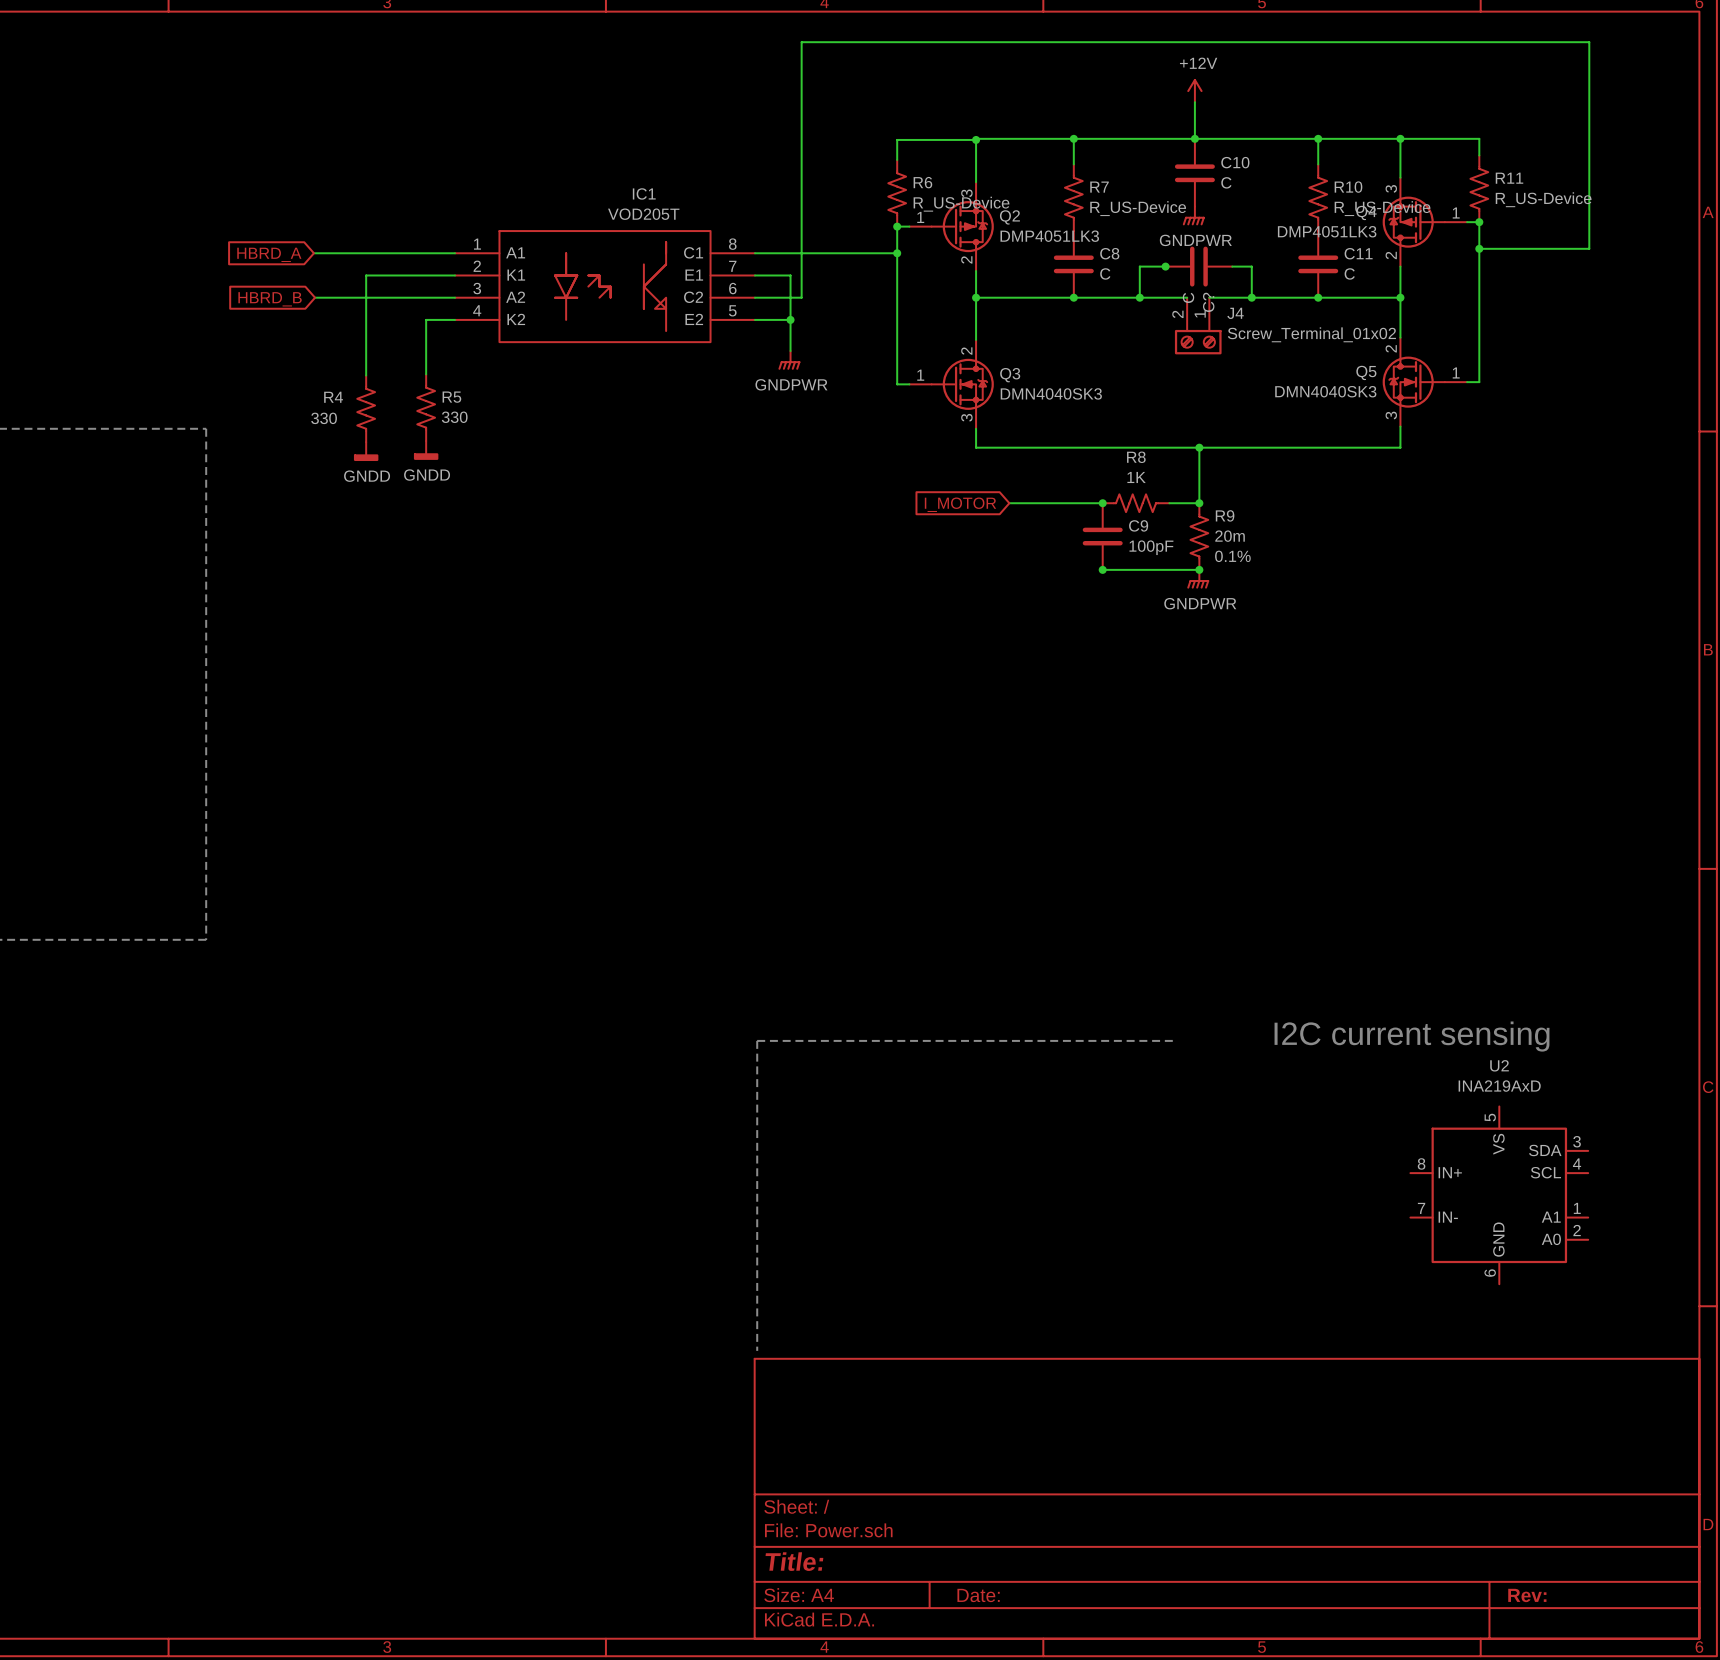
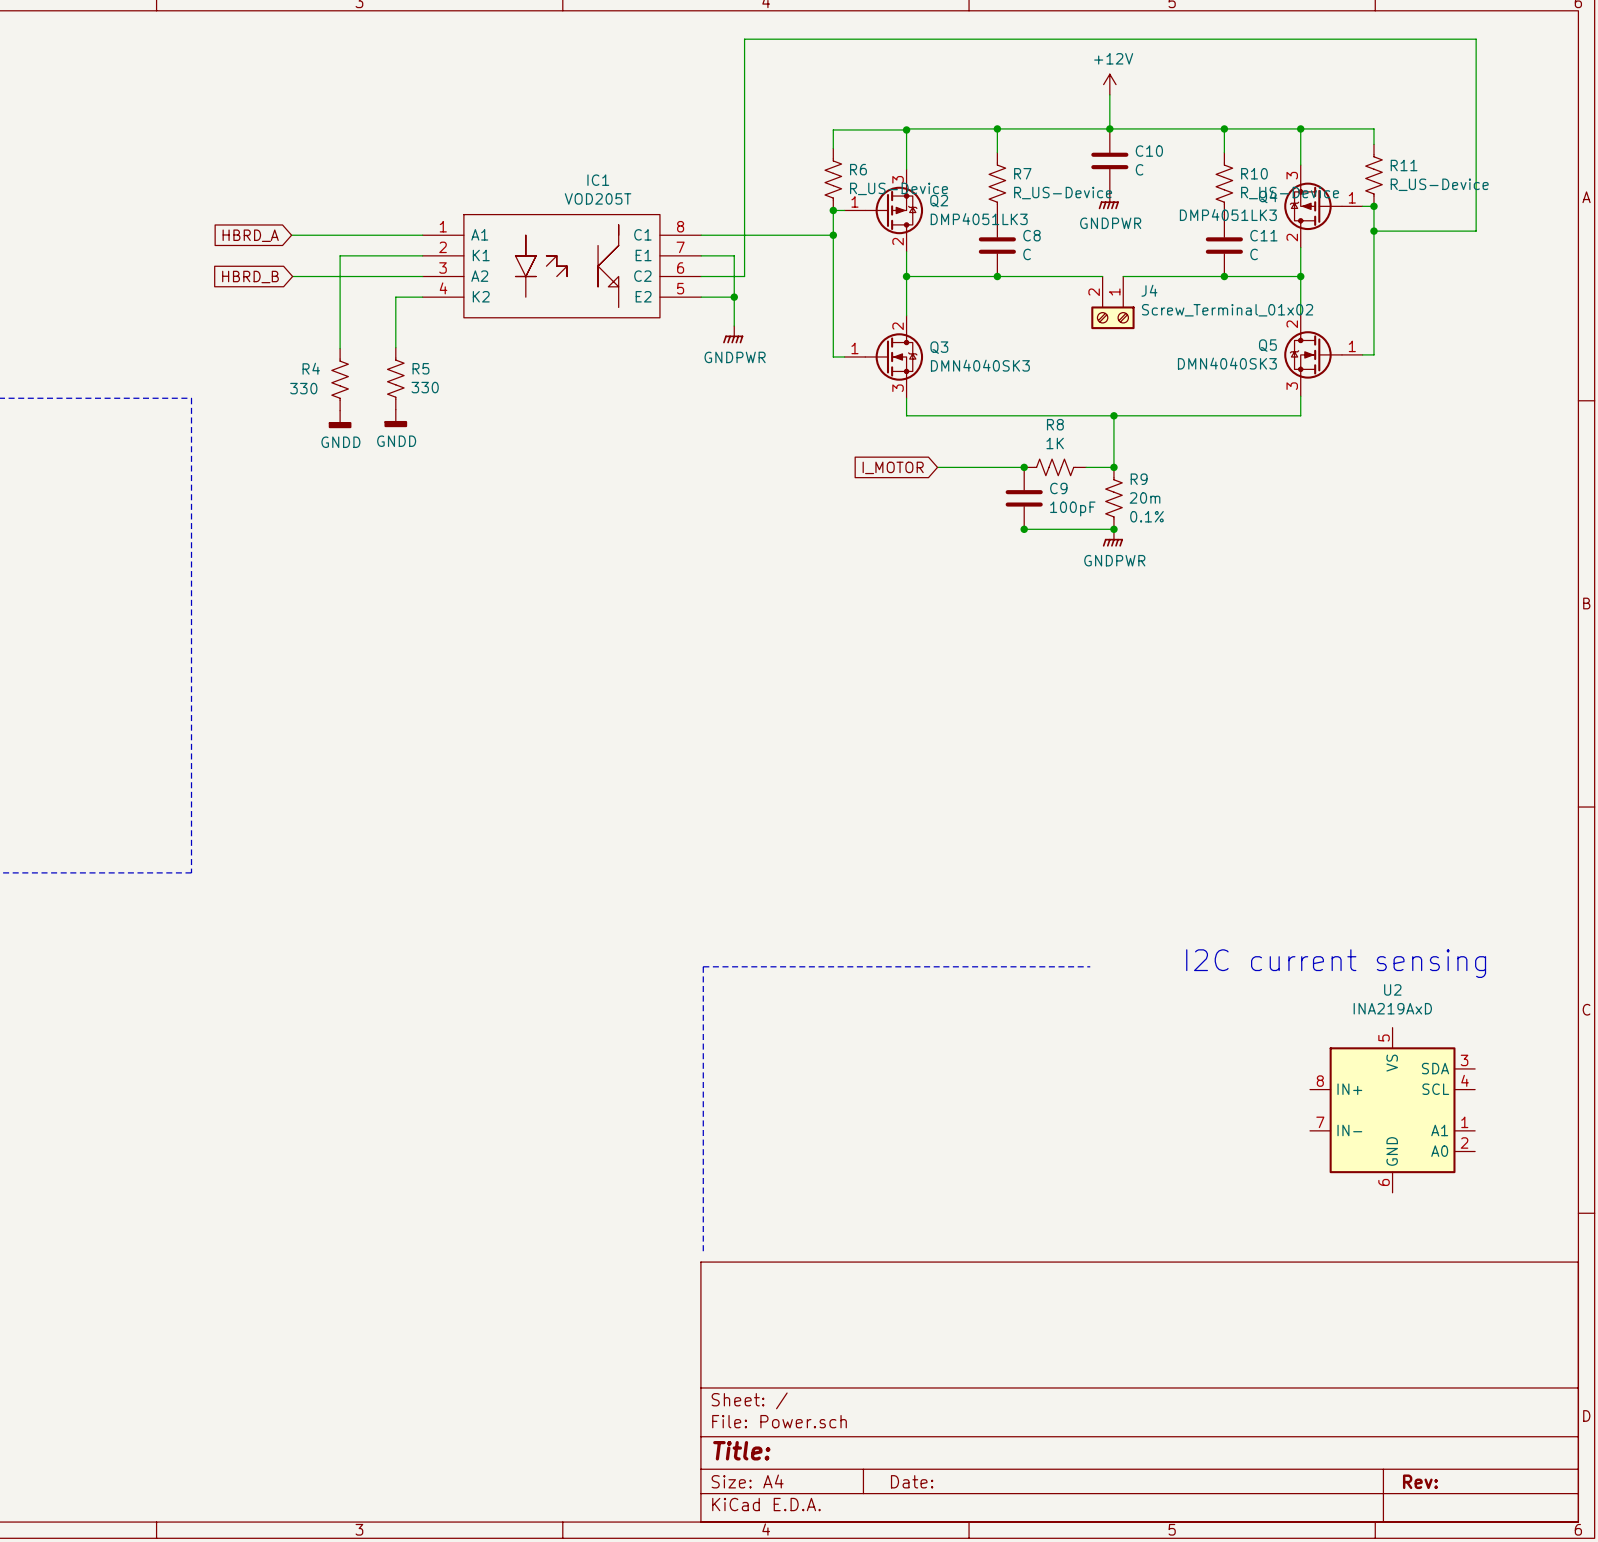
junction: (1165, 266) -> none
wire: (1166, 266) (1139, 266) (1139, 297) -> none
C?: C (1198, 266) -> none
wire: (1232, 266) (1251, 266) (1251, 297) -> none
junction: (1139, 297) -> none
junction: (1251, 297) -> none

